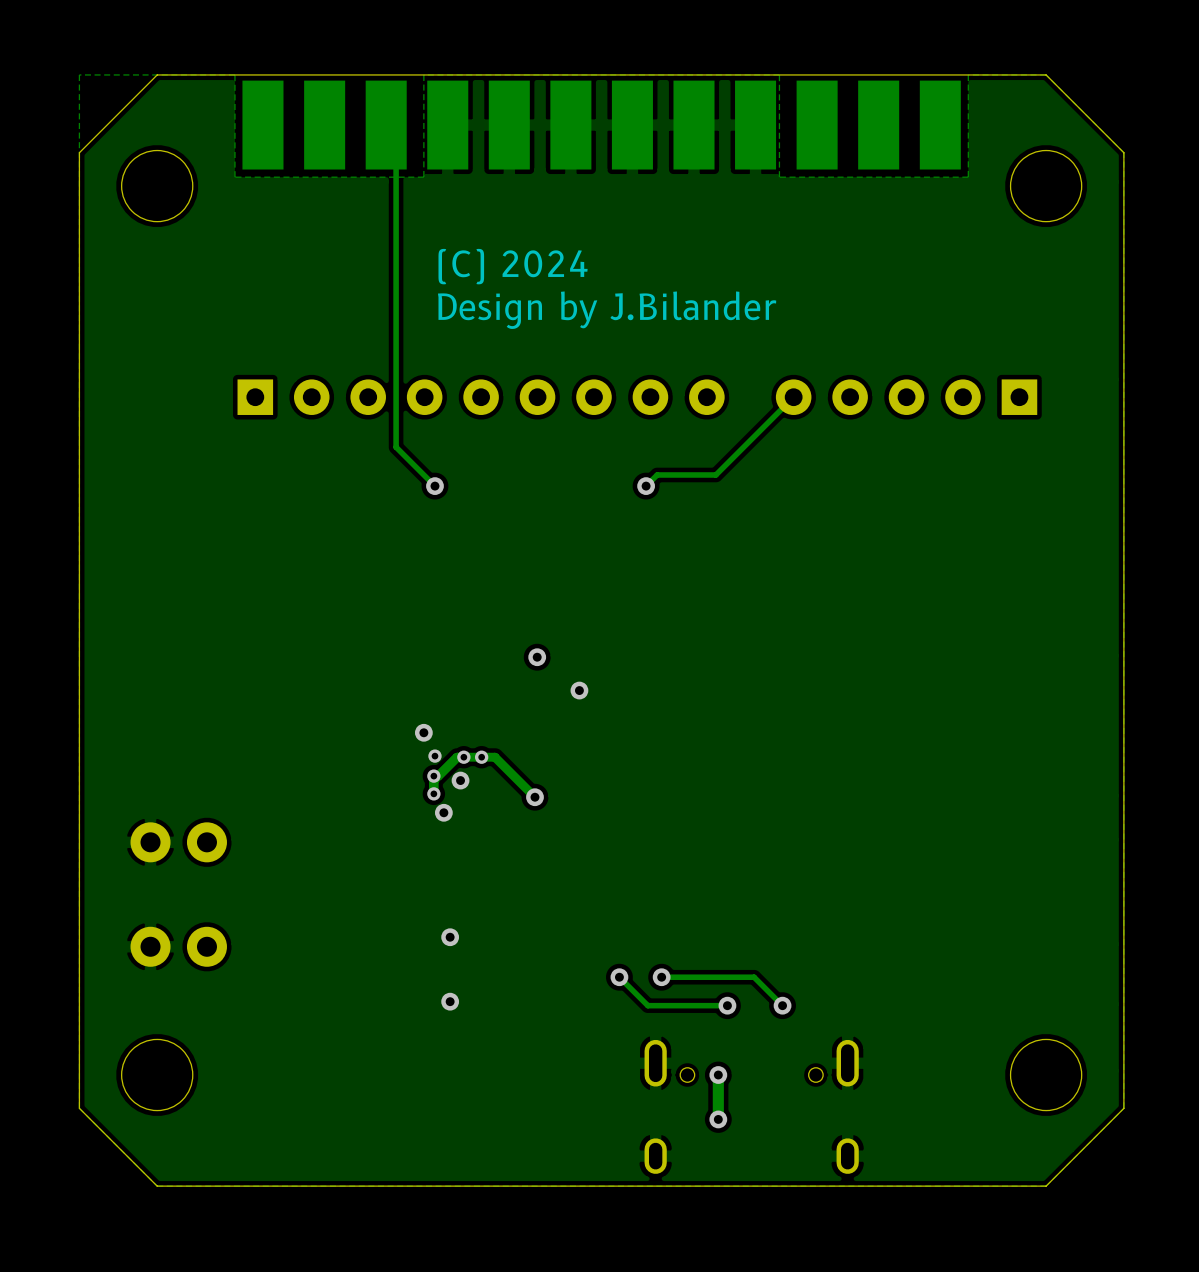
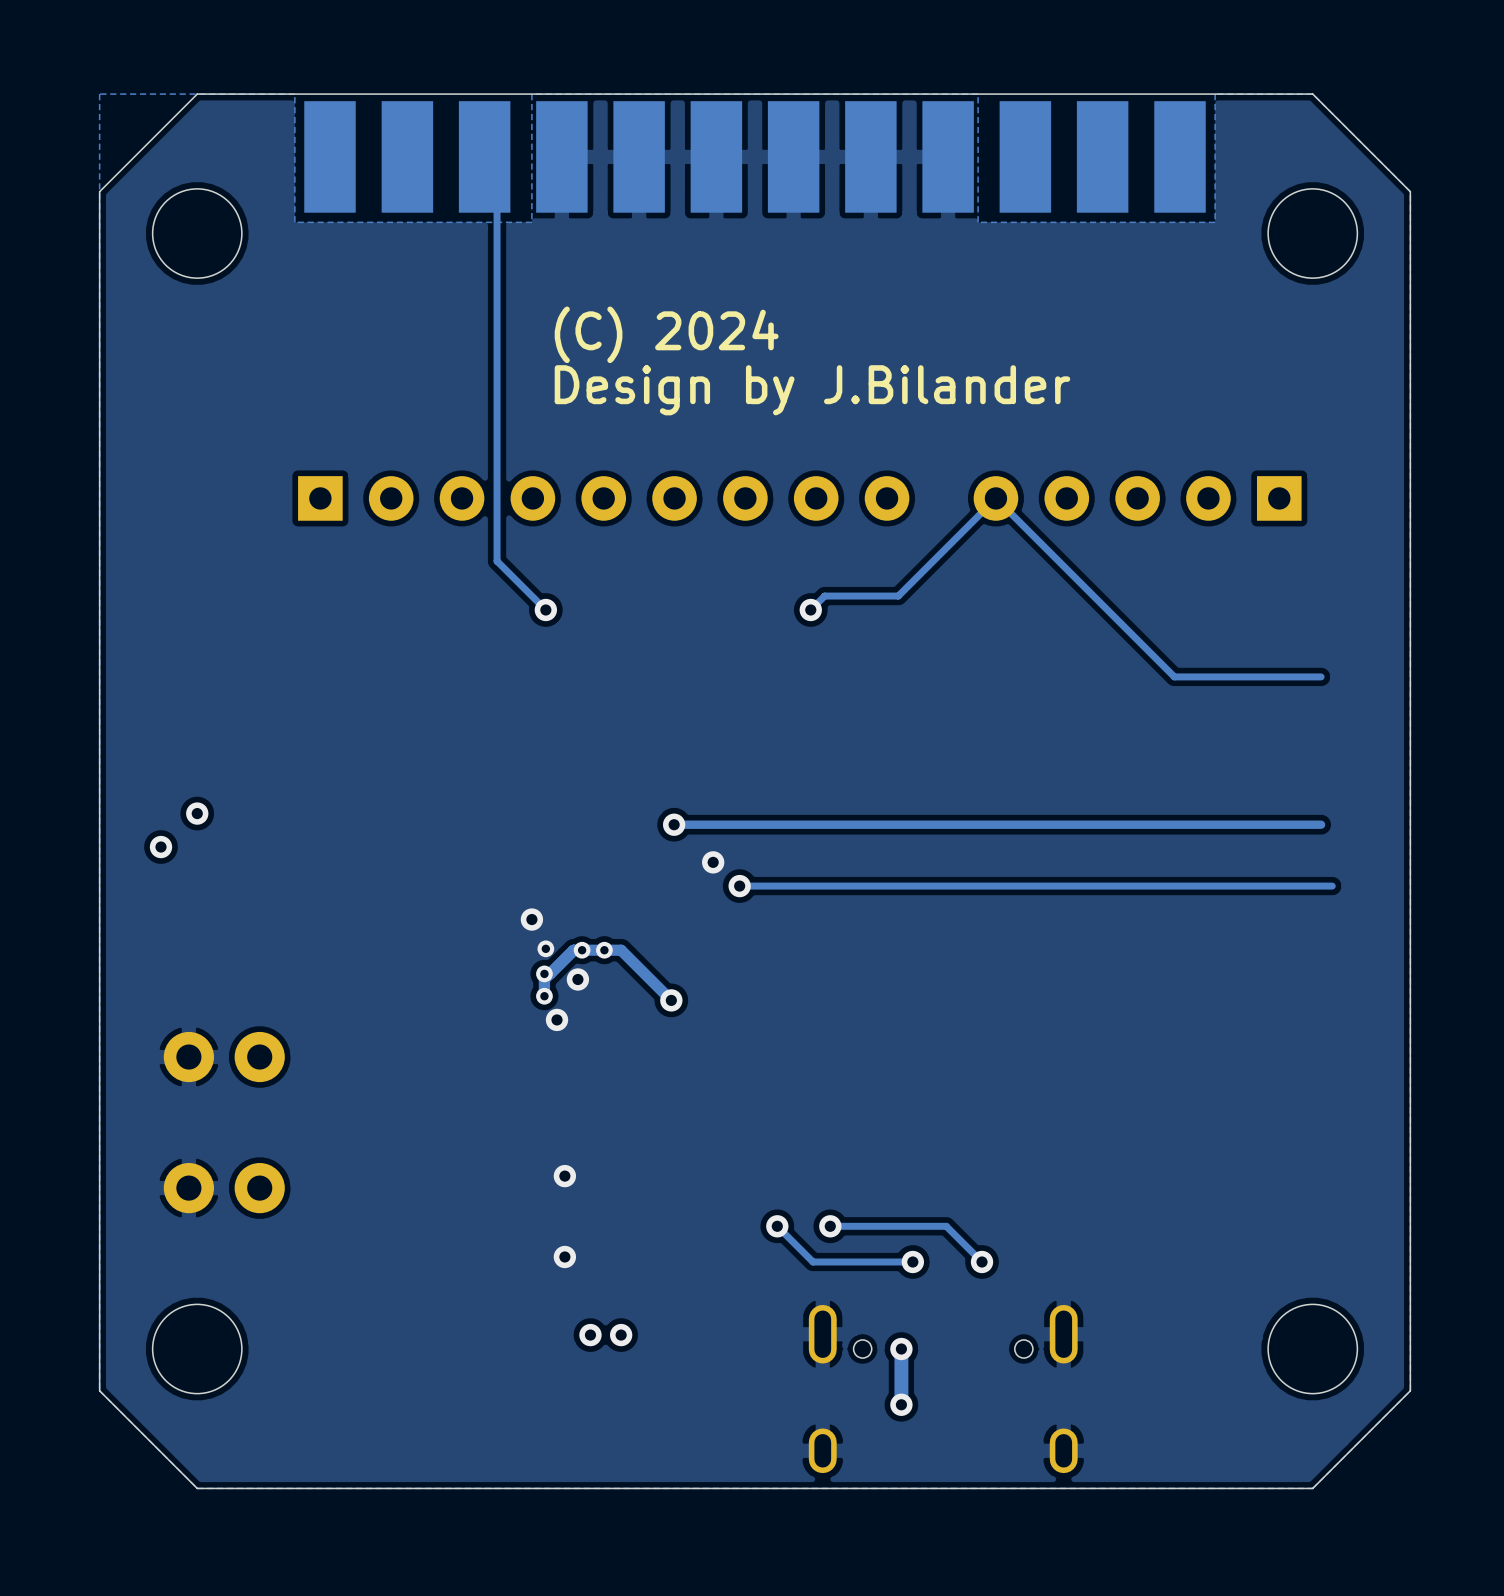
track: none -> (995, 498) (1174, 676) (1321, 676)
via: none -> (197, 813)
track: none -> (1321, 824) (674, 824)
via: none -> (161, 847)
via: none -> (713, 862)
via: (579, 690) -> none
via: none -> (739, 886)
track: none -> (1332, 886) (739, 886)
via: none -> (590, 1335)
via: none -> (621, 1335)

